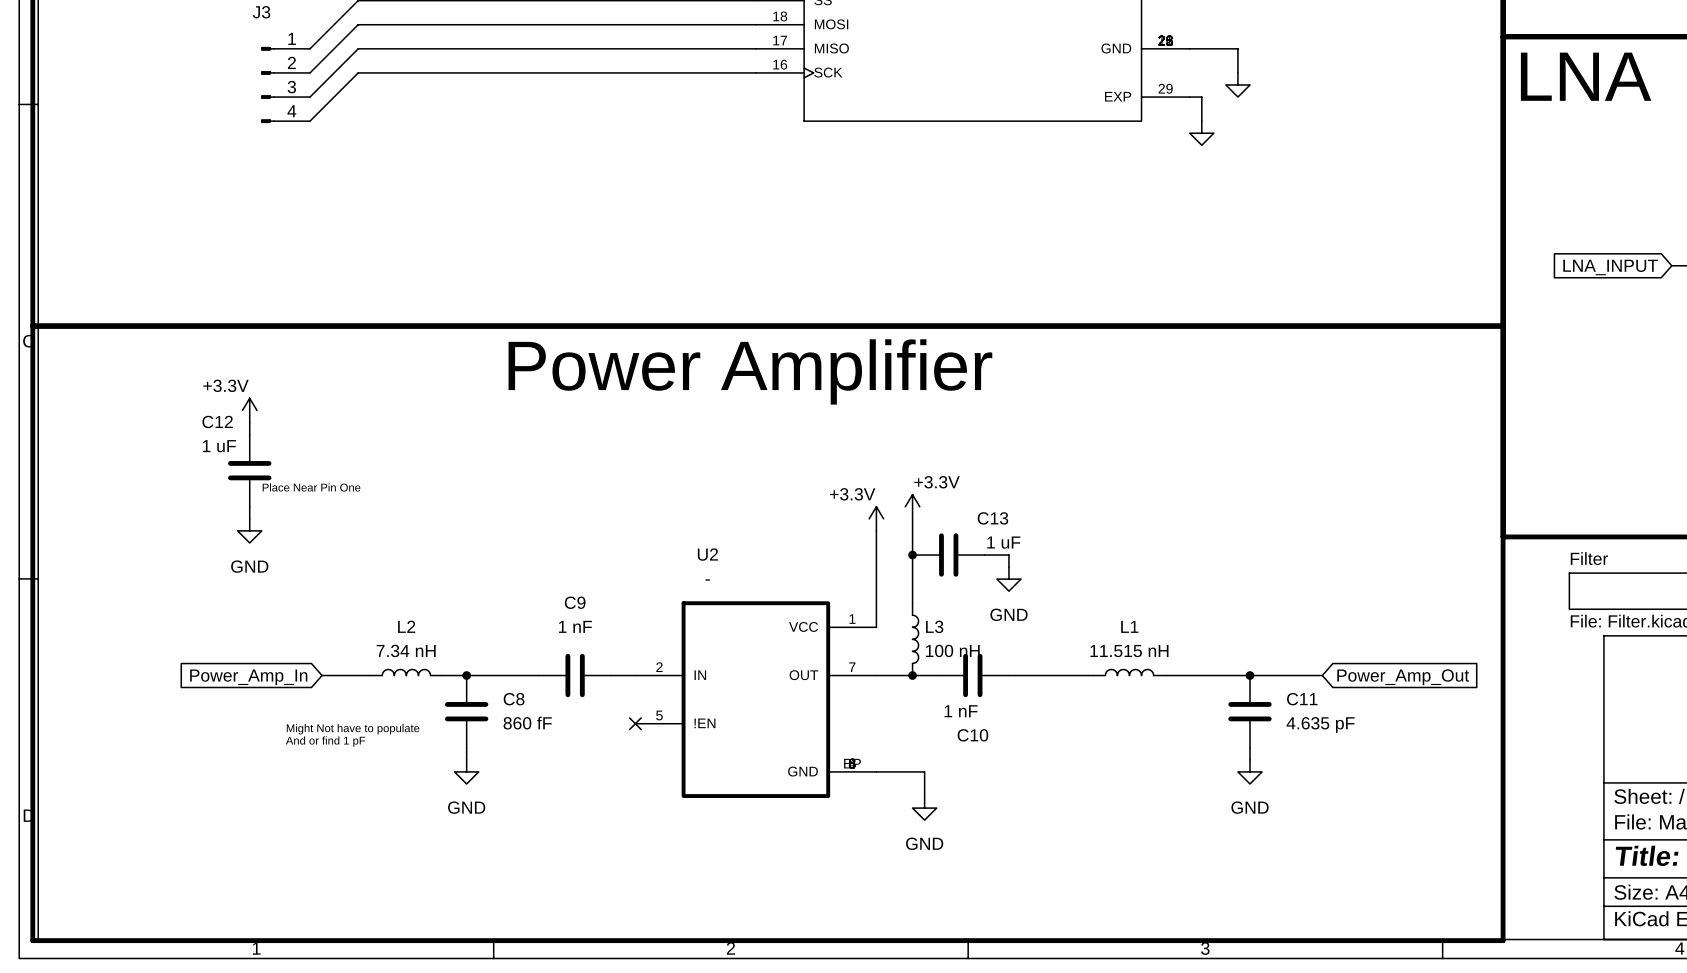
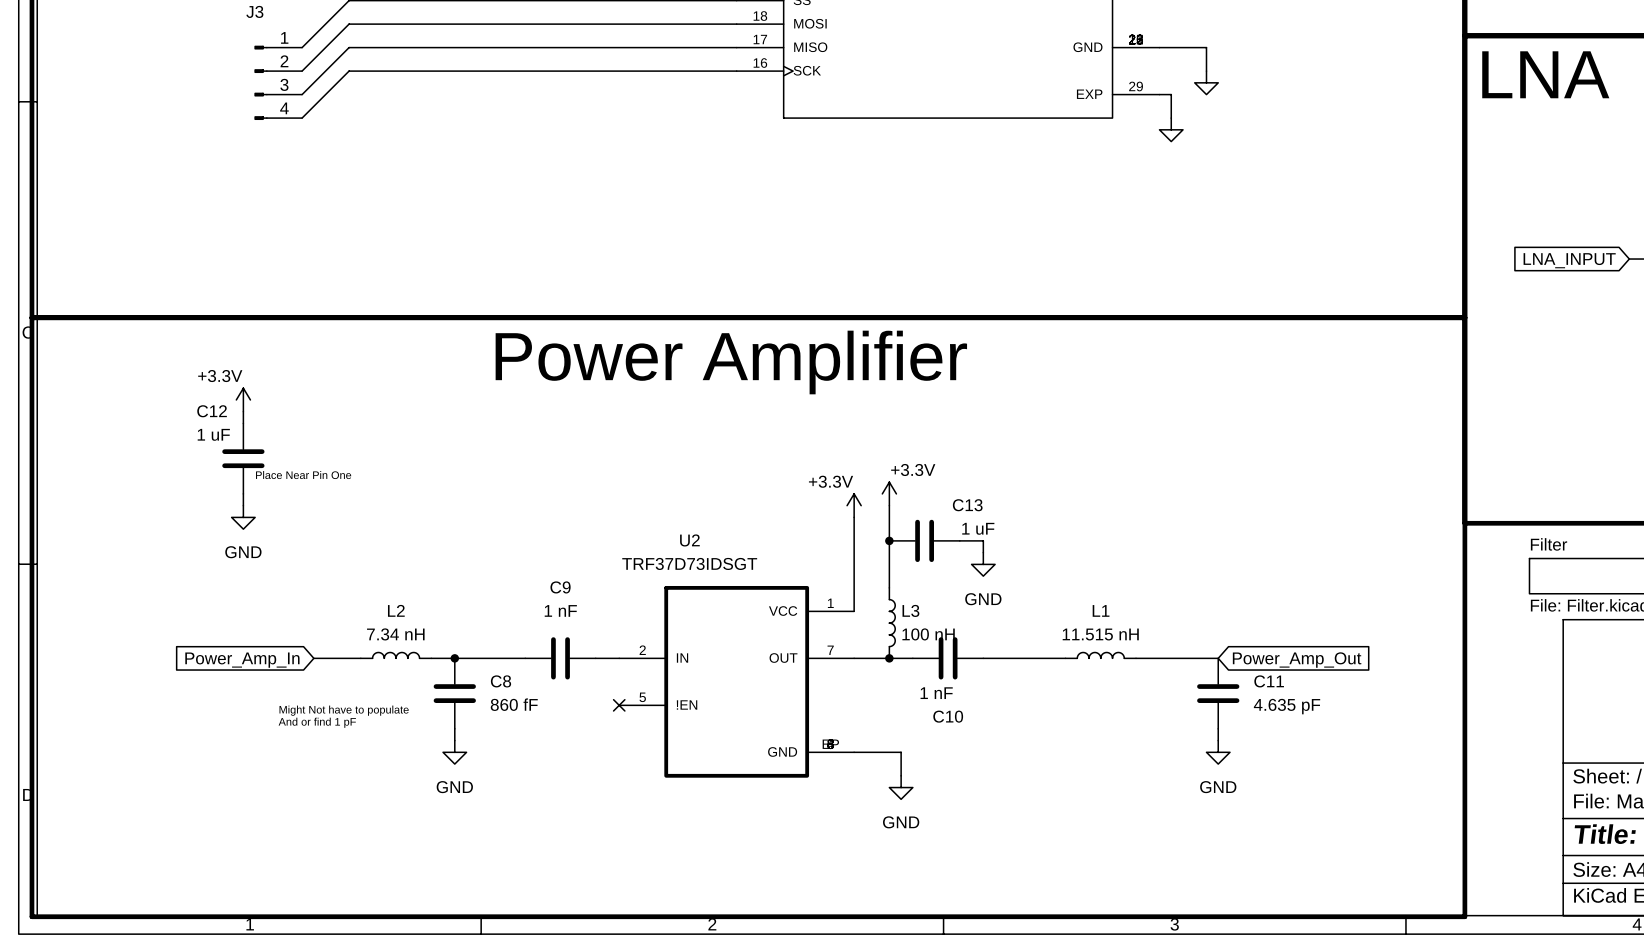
U2 value: - (707, 580) -> TRF37D73IDSGT (689, 563)
wire: (1250, 675) (1322, 675) -> none
junction: (1250, 675) -> none
global label position: Power_Amp_Out (1403, 677) -> Power_Amp_Out (1297, 660)

